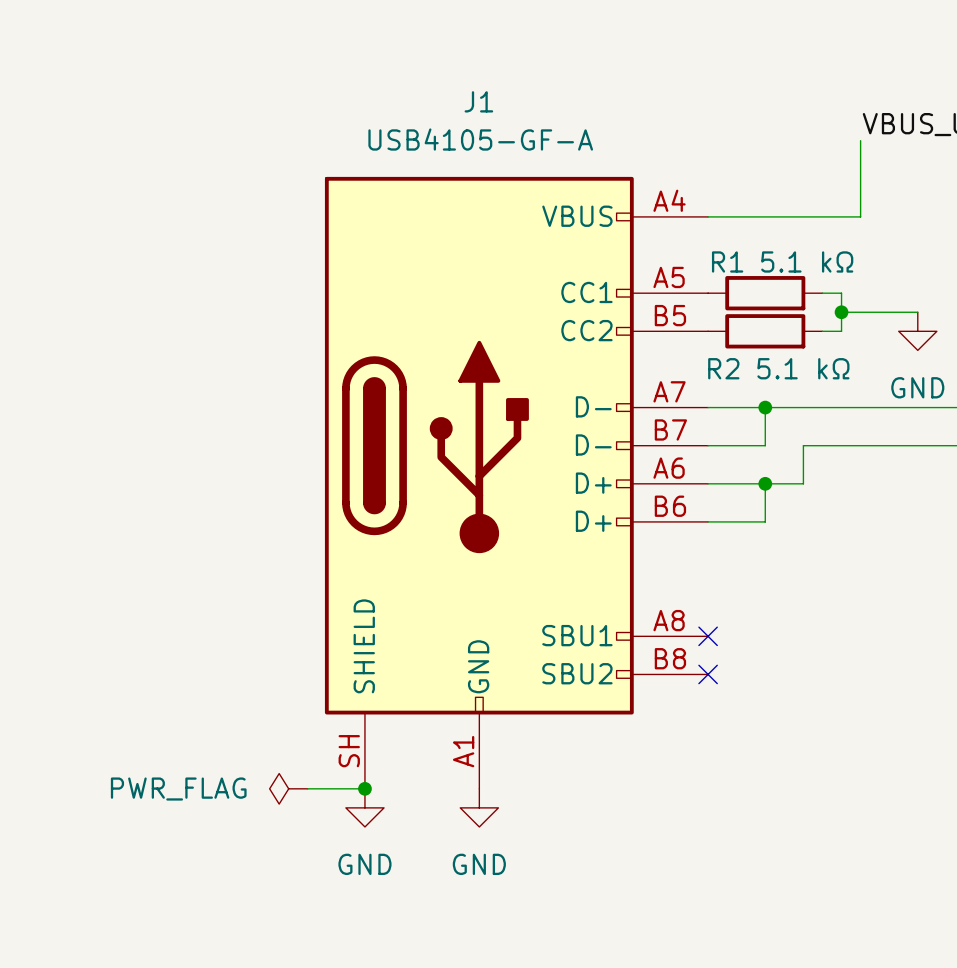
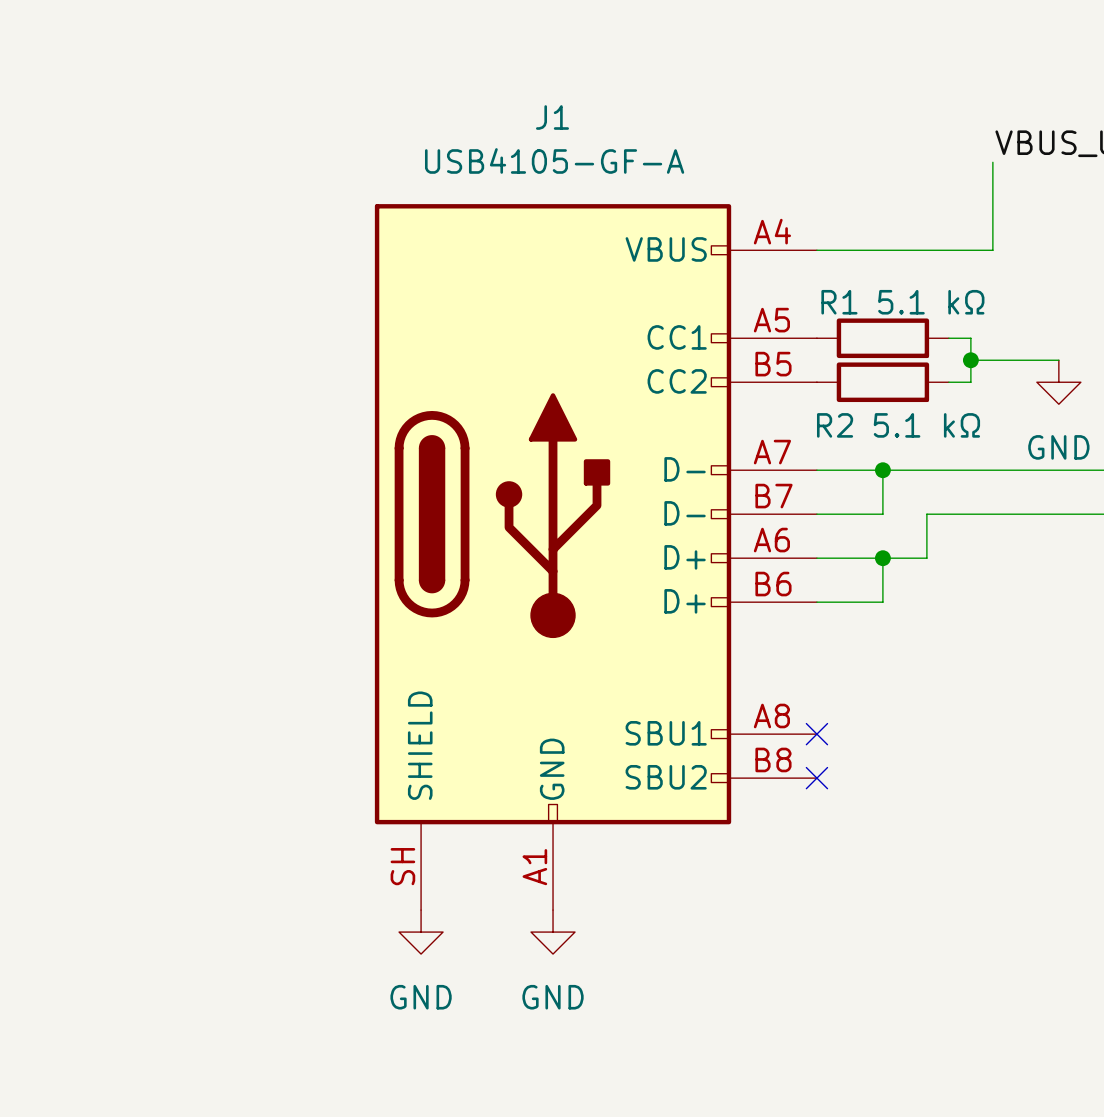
power symbol: PWR_FLAG (288, 788) -> none
wire: (307, 788) (364, 788) -> none
junction: (364, 788) -> none

